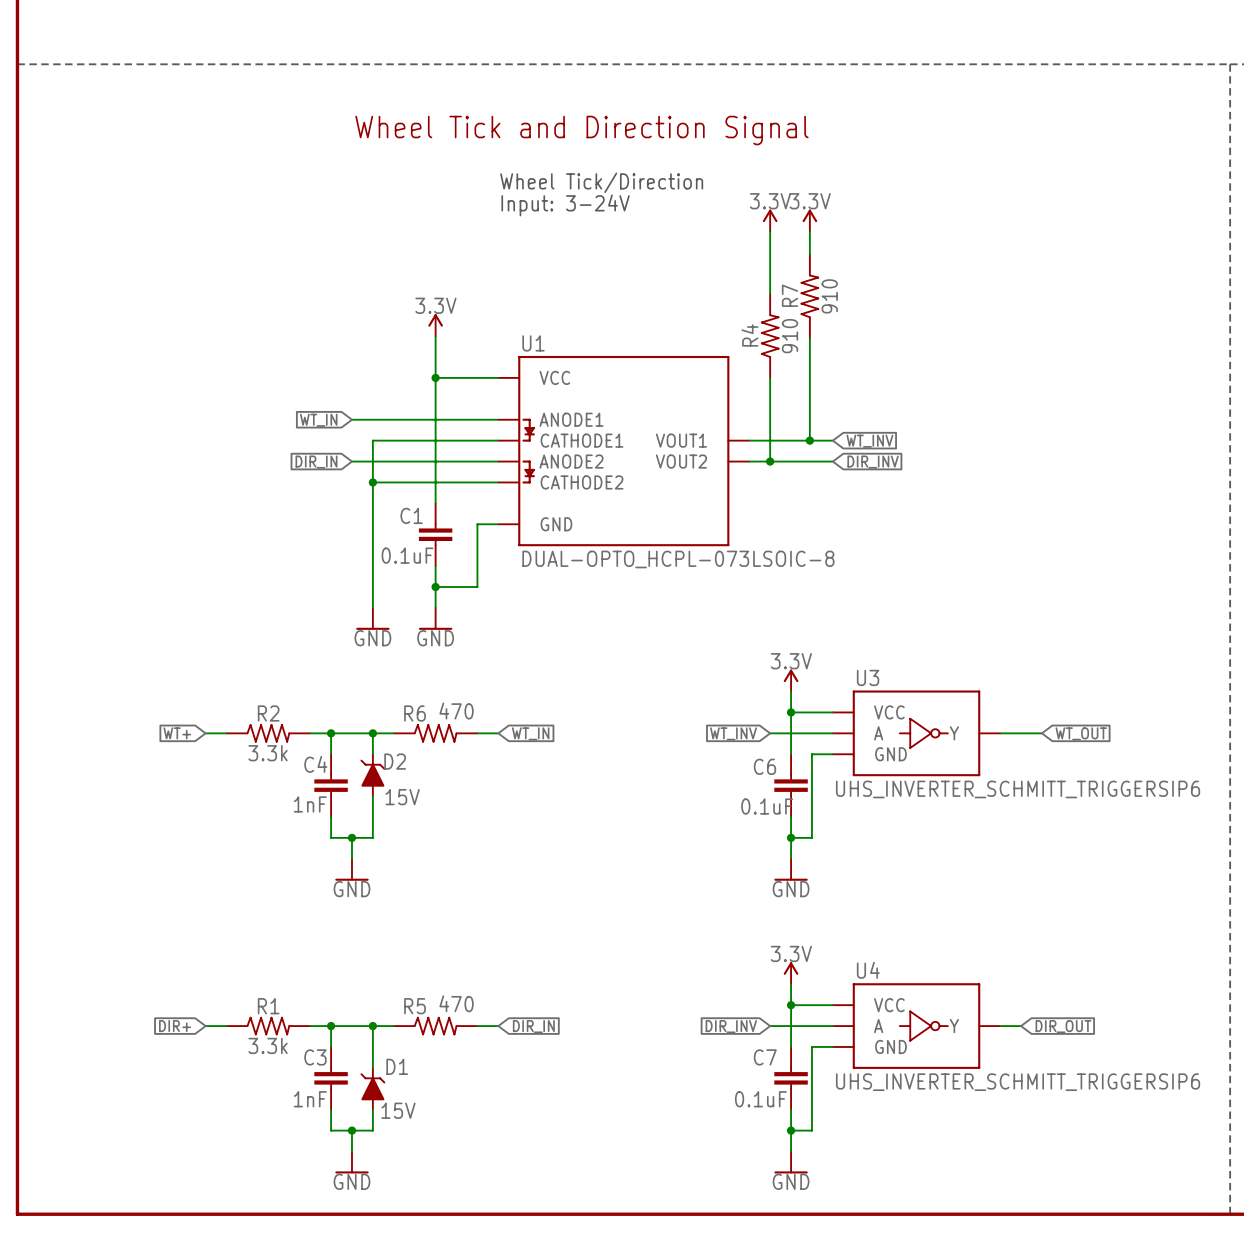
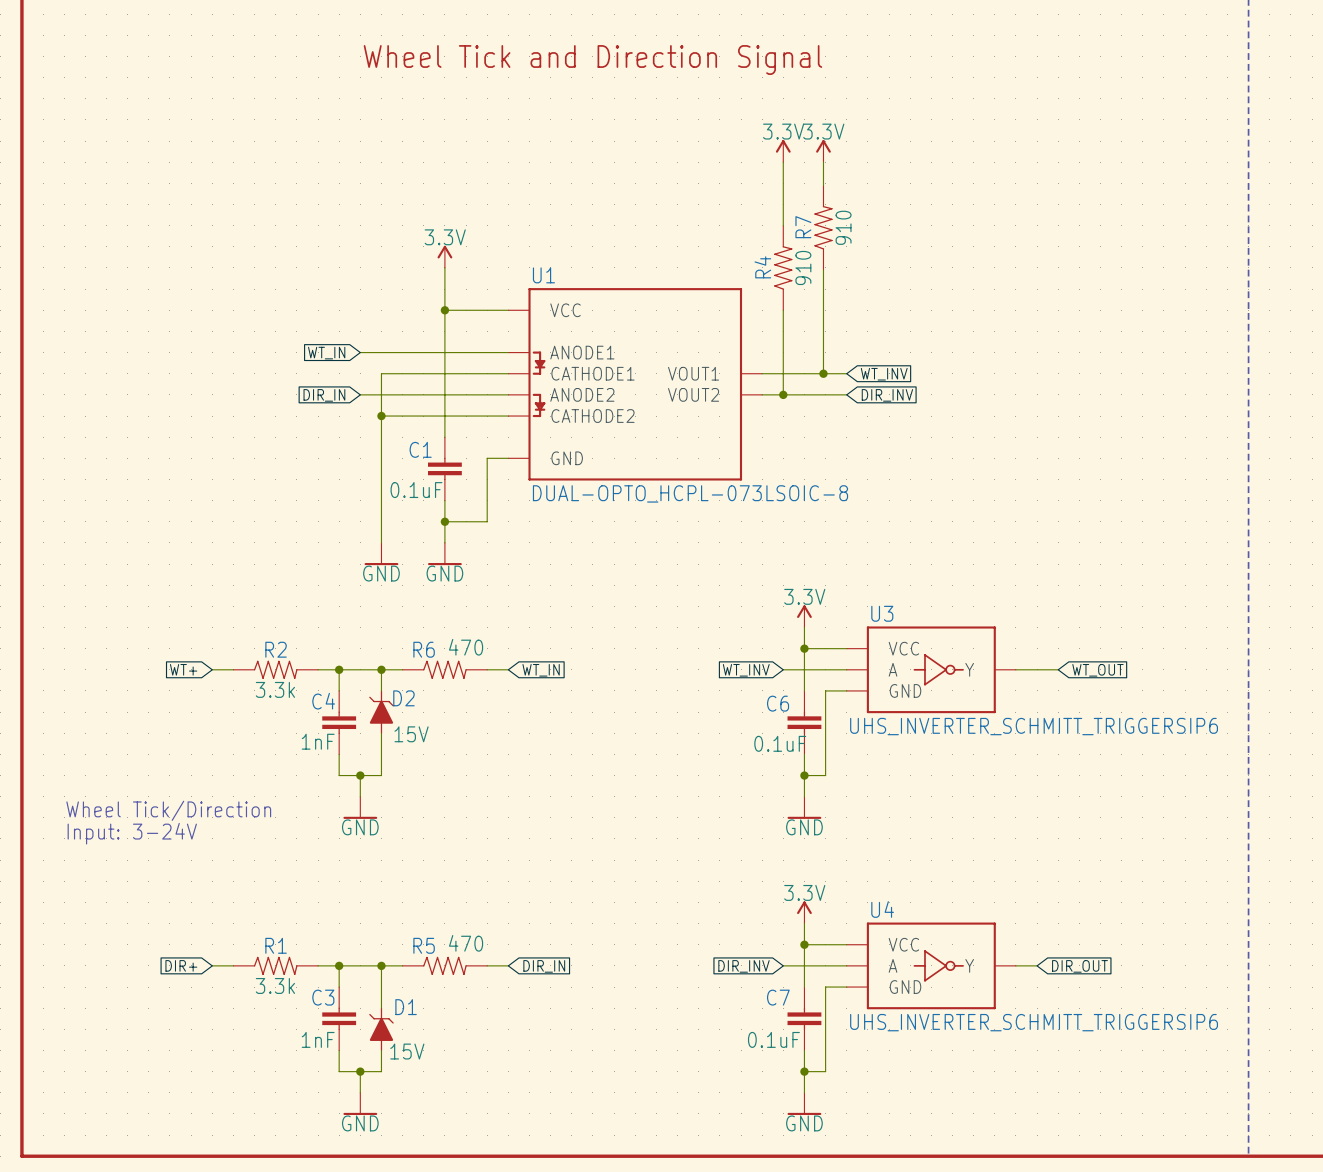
text: Wheel Tick/Direction (601, 182) -> none
text: Input: 3-24V (565, 205) -> none
text: none -> Wheel Tick/Direction (168, 810)
text: none -> Input: 3-24V (132, 833)

